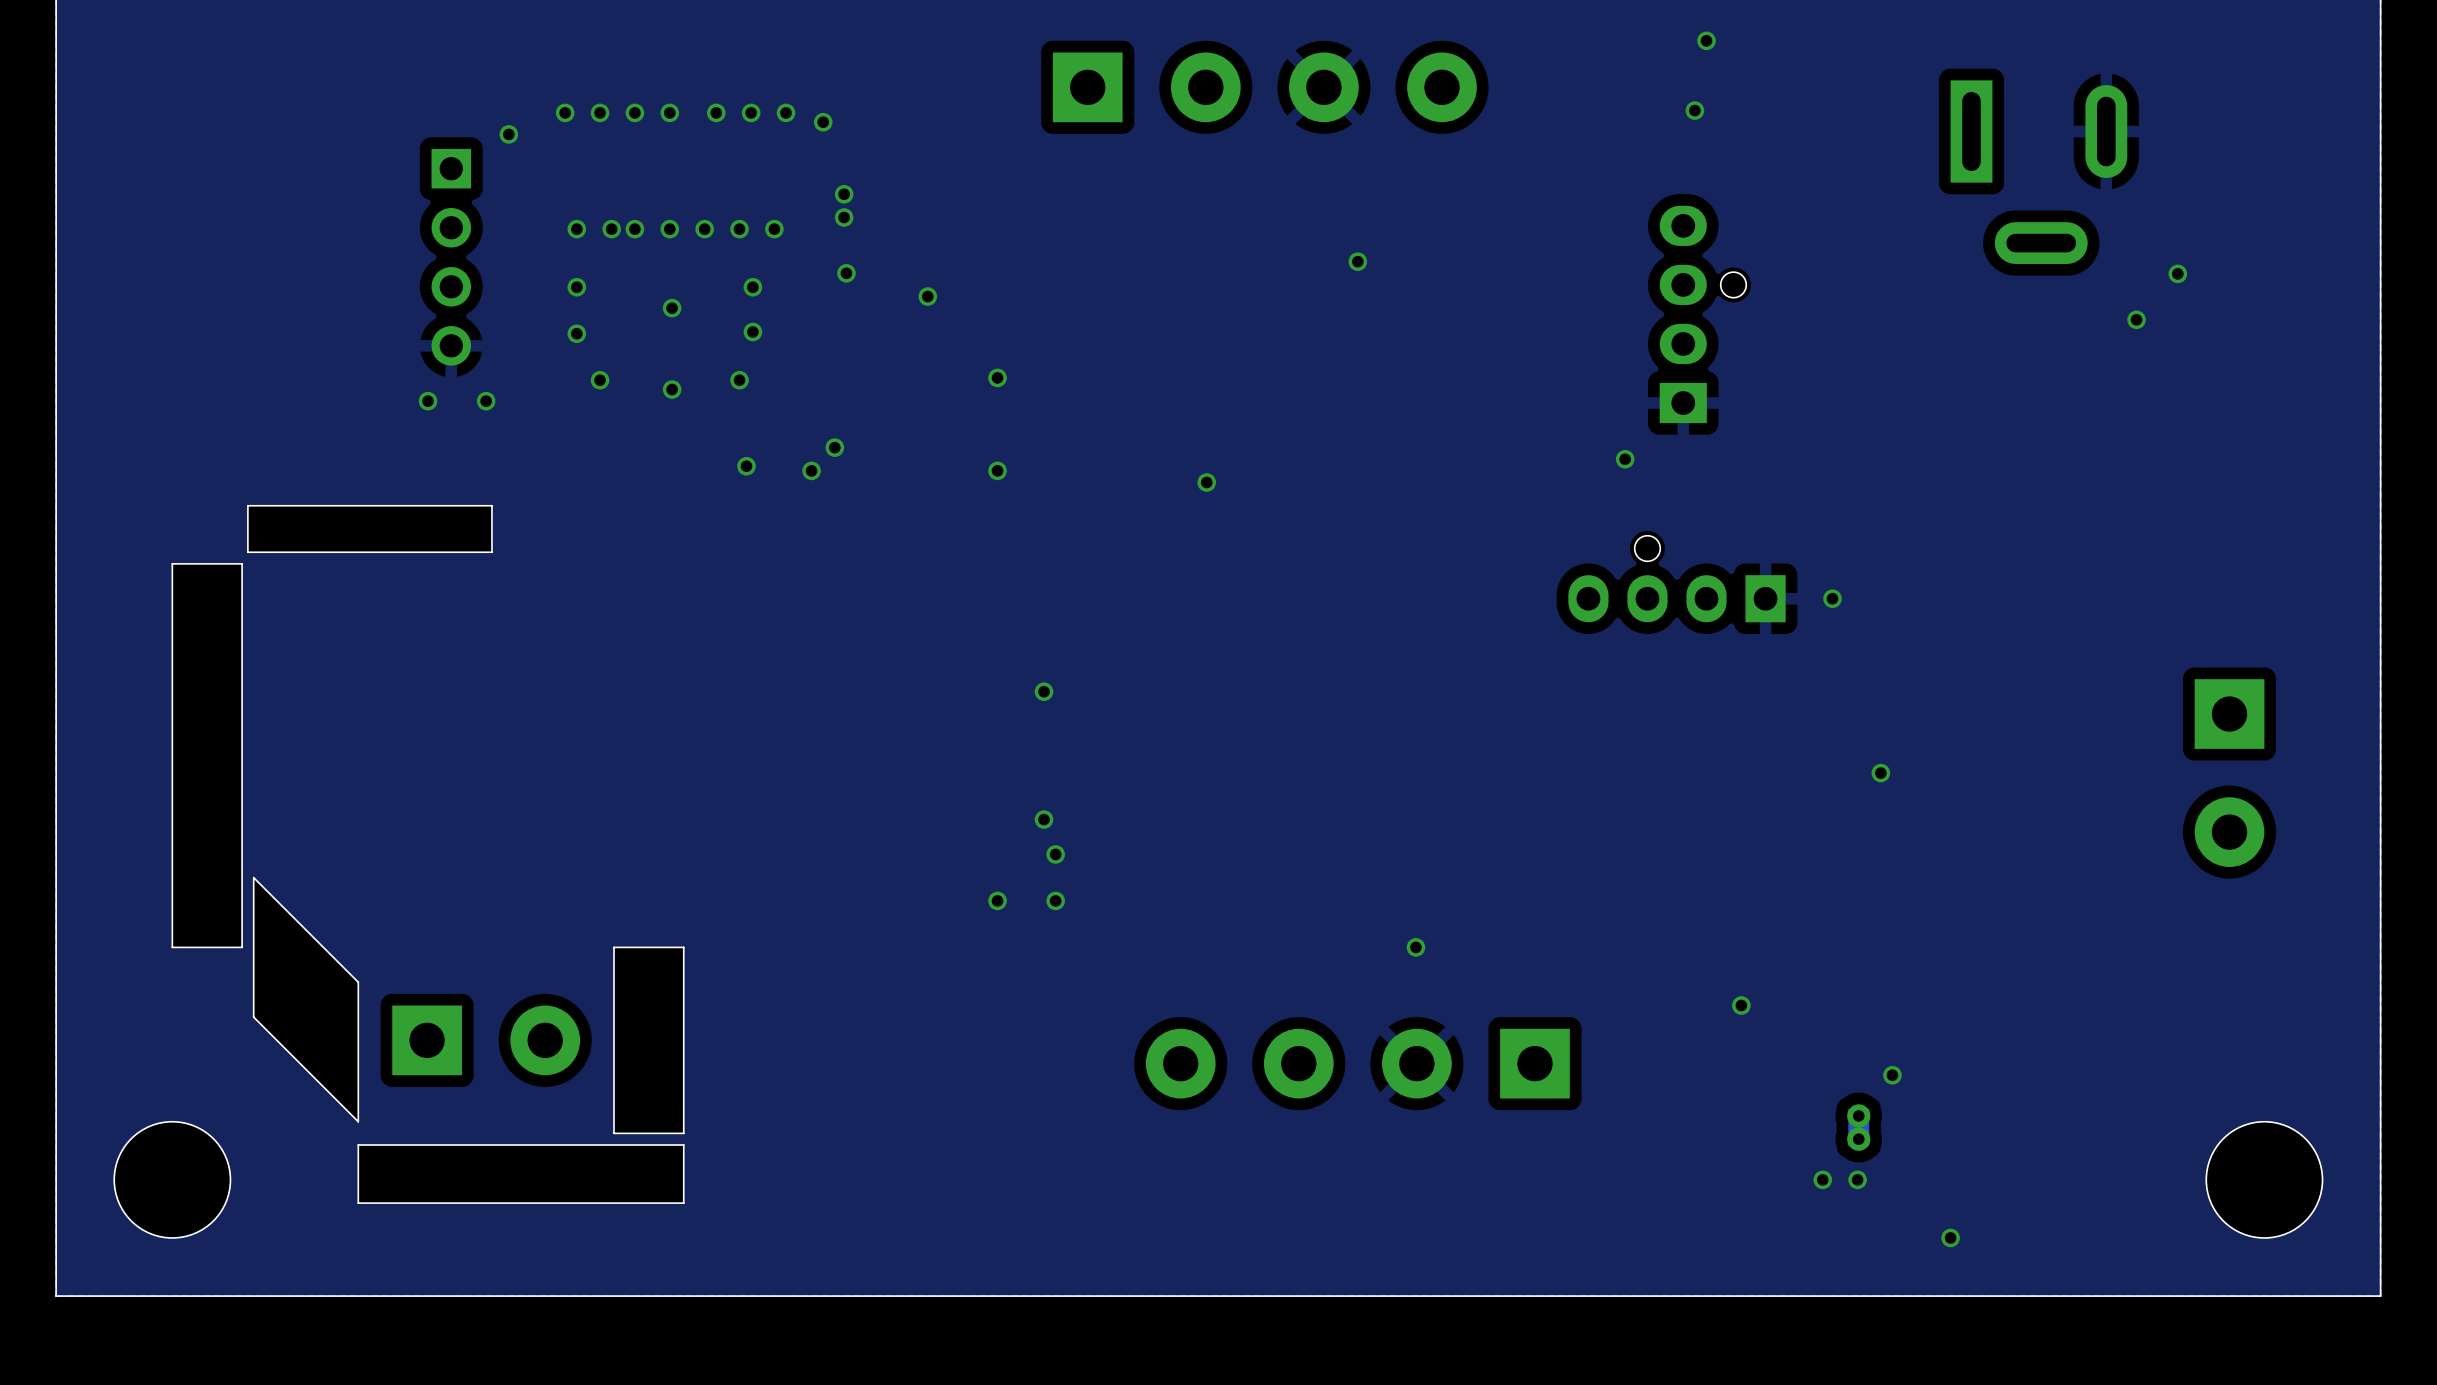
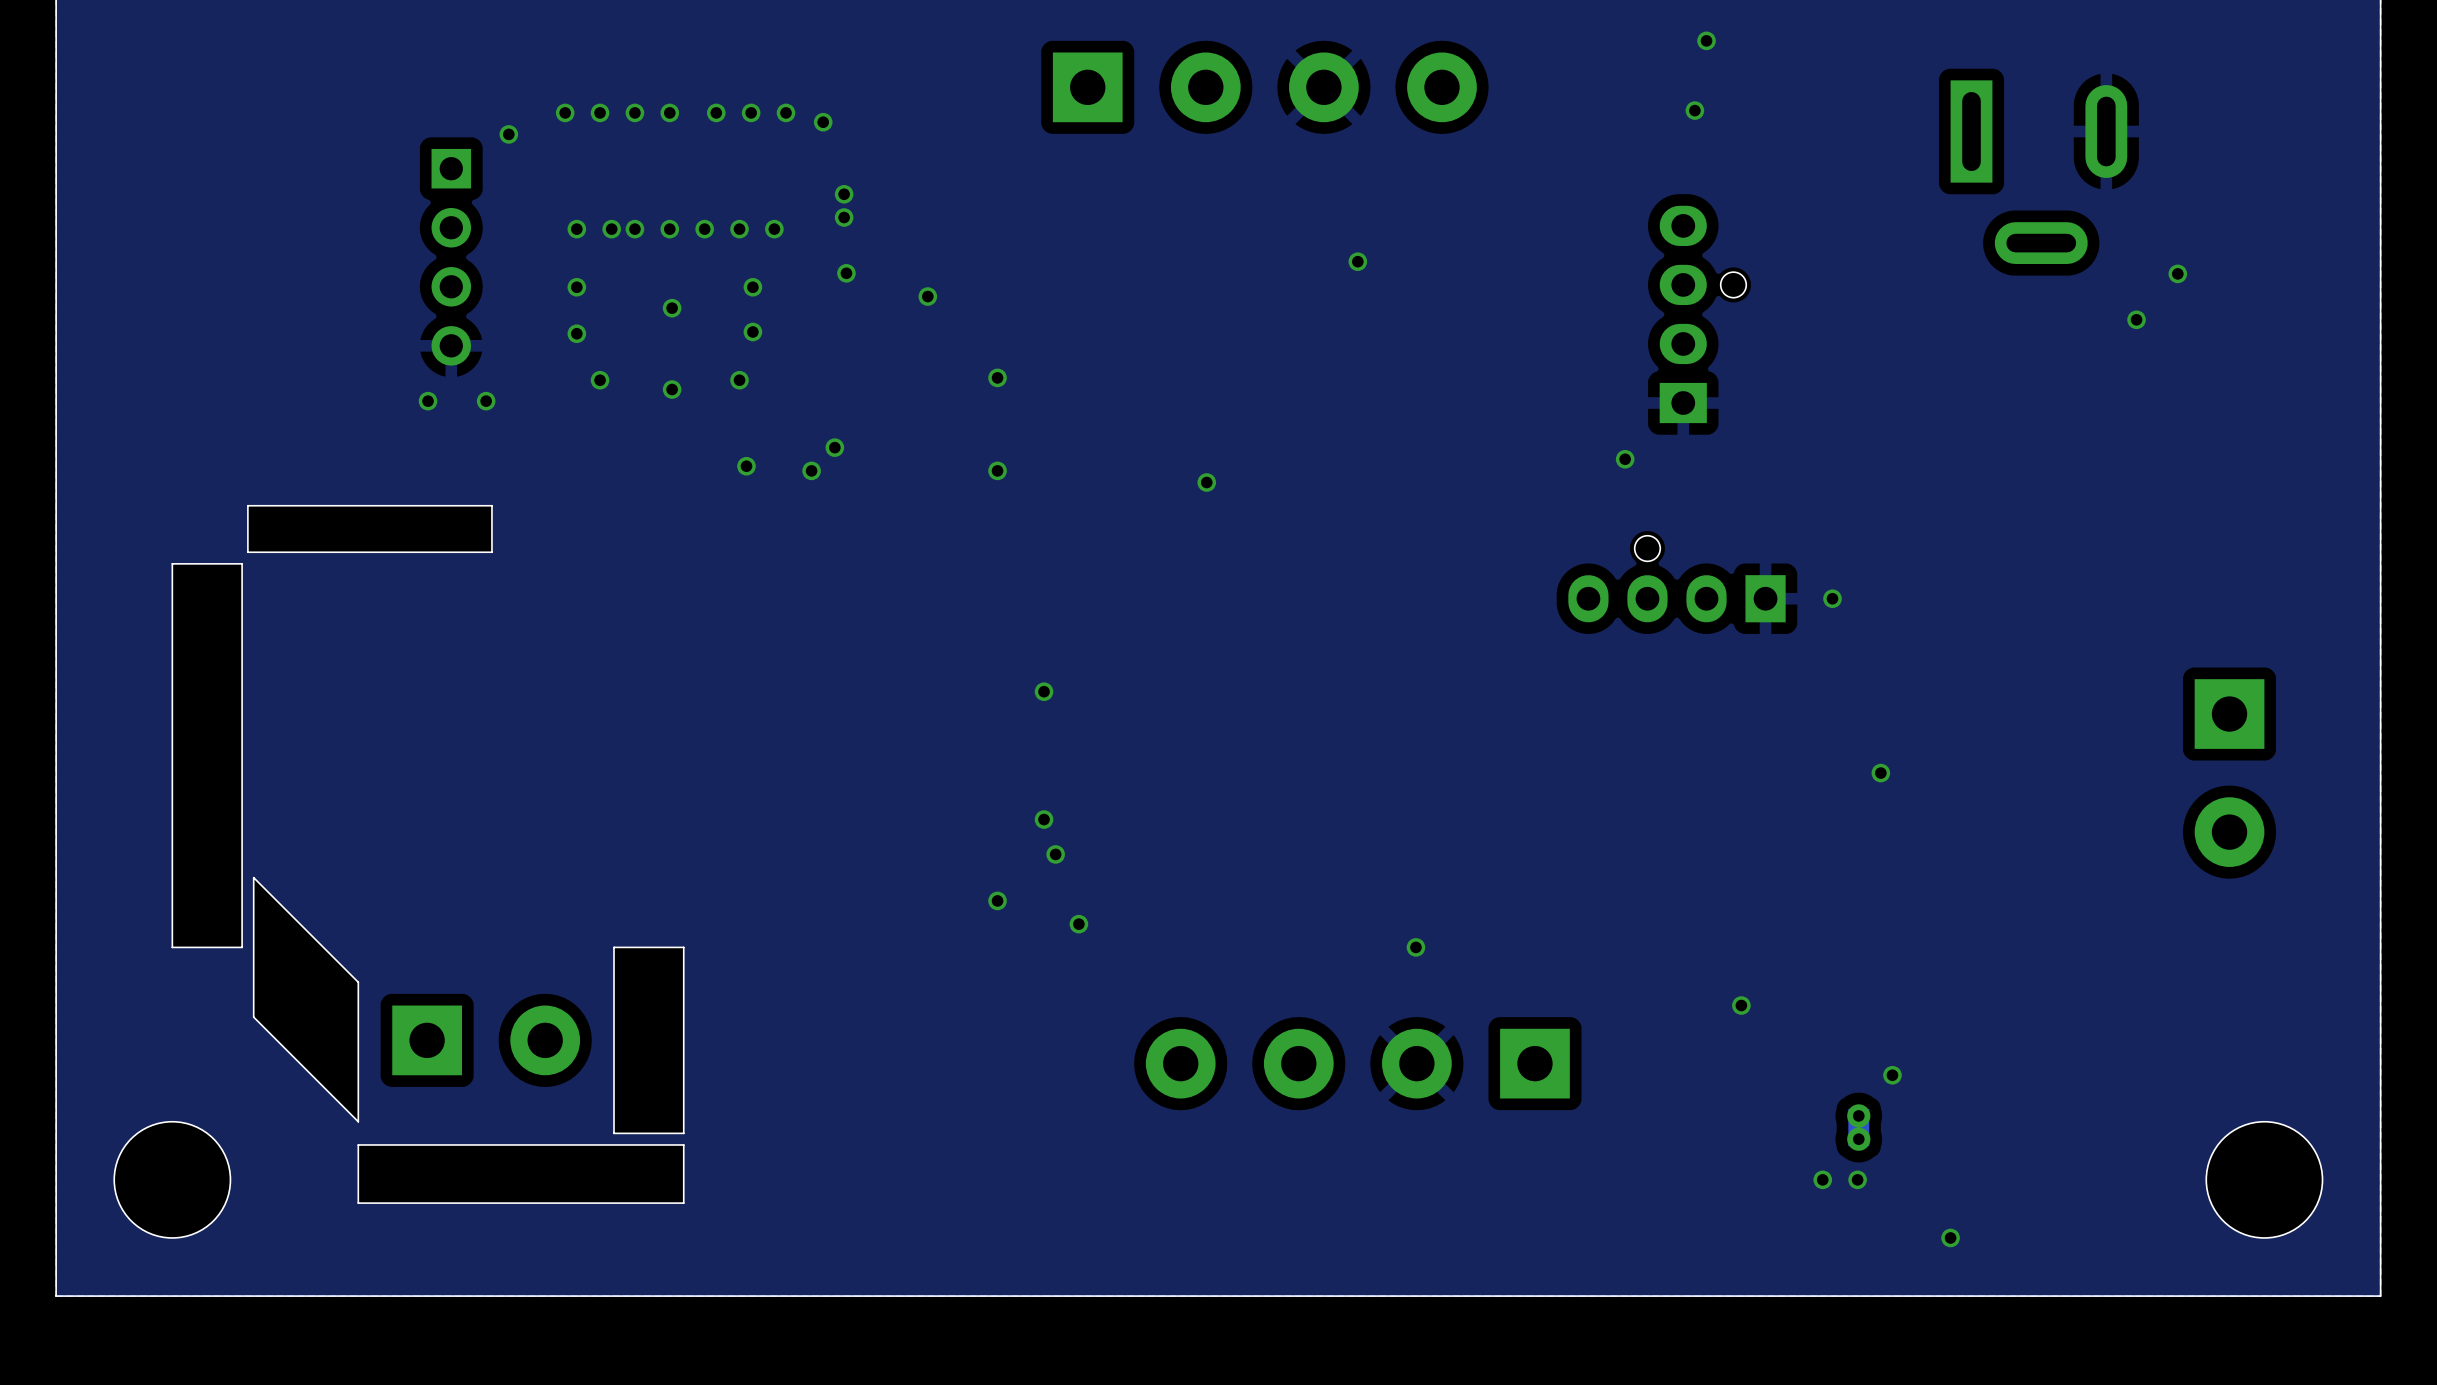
via position: (1055, 900) -> (1078, 924)

